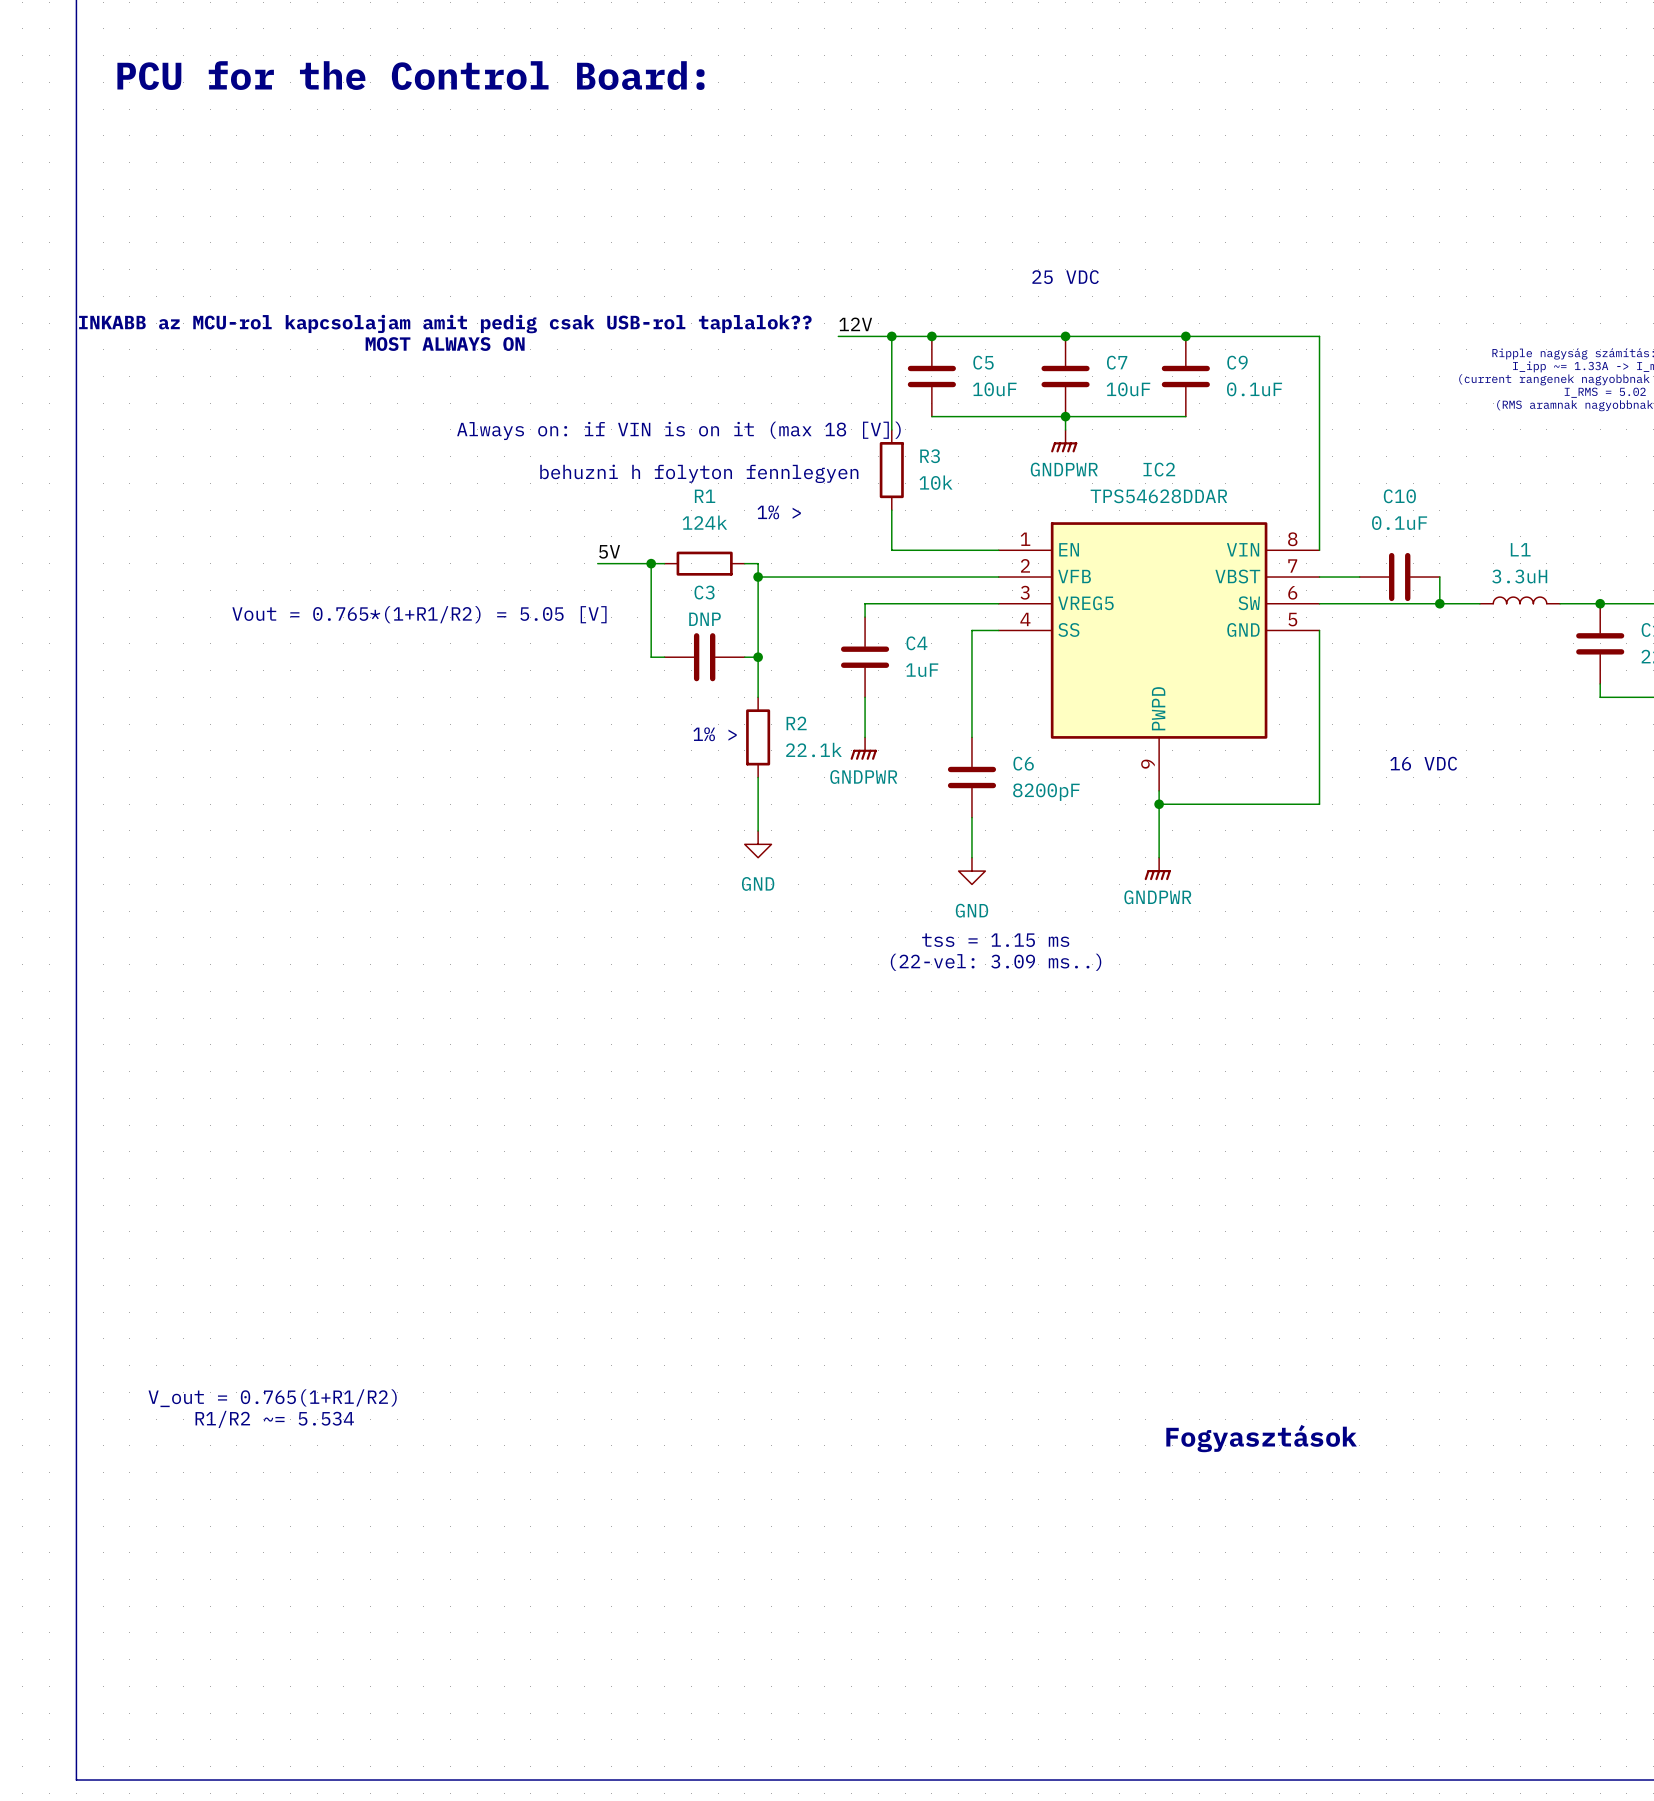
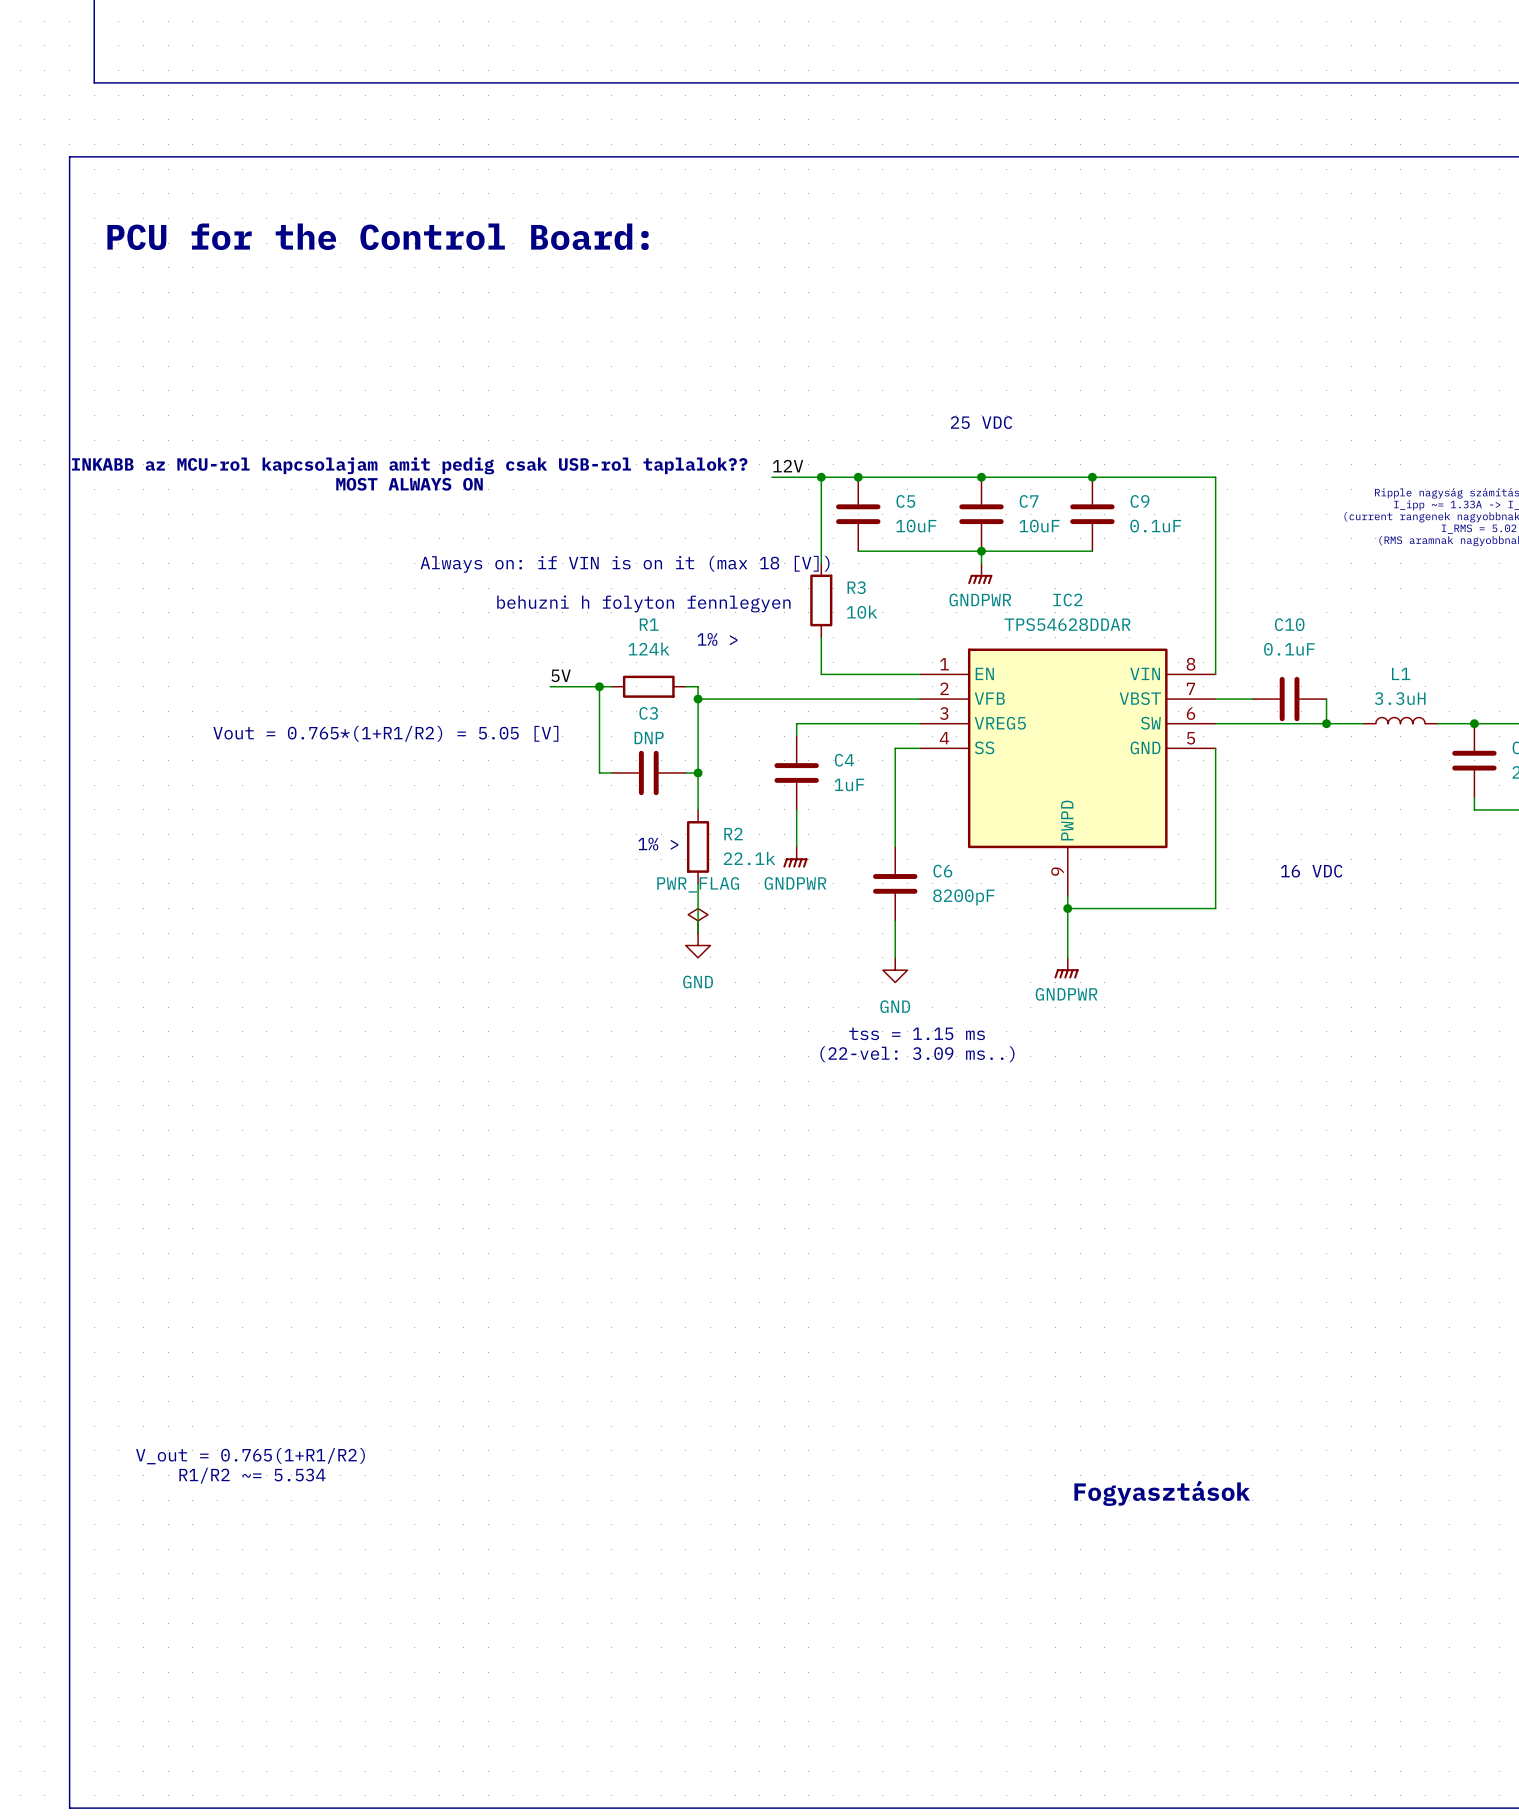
power symbol: none -> PWR_FLAG (698, 920)

